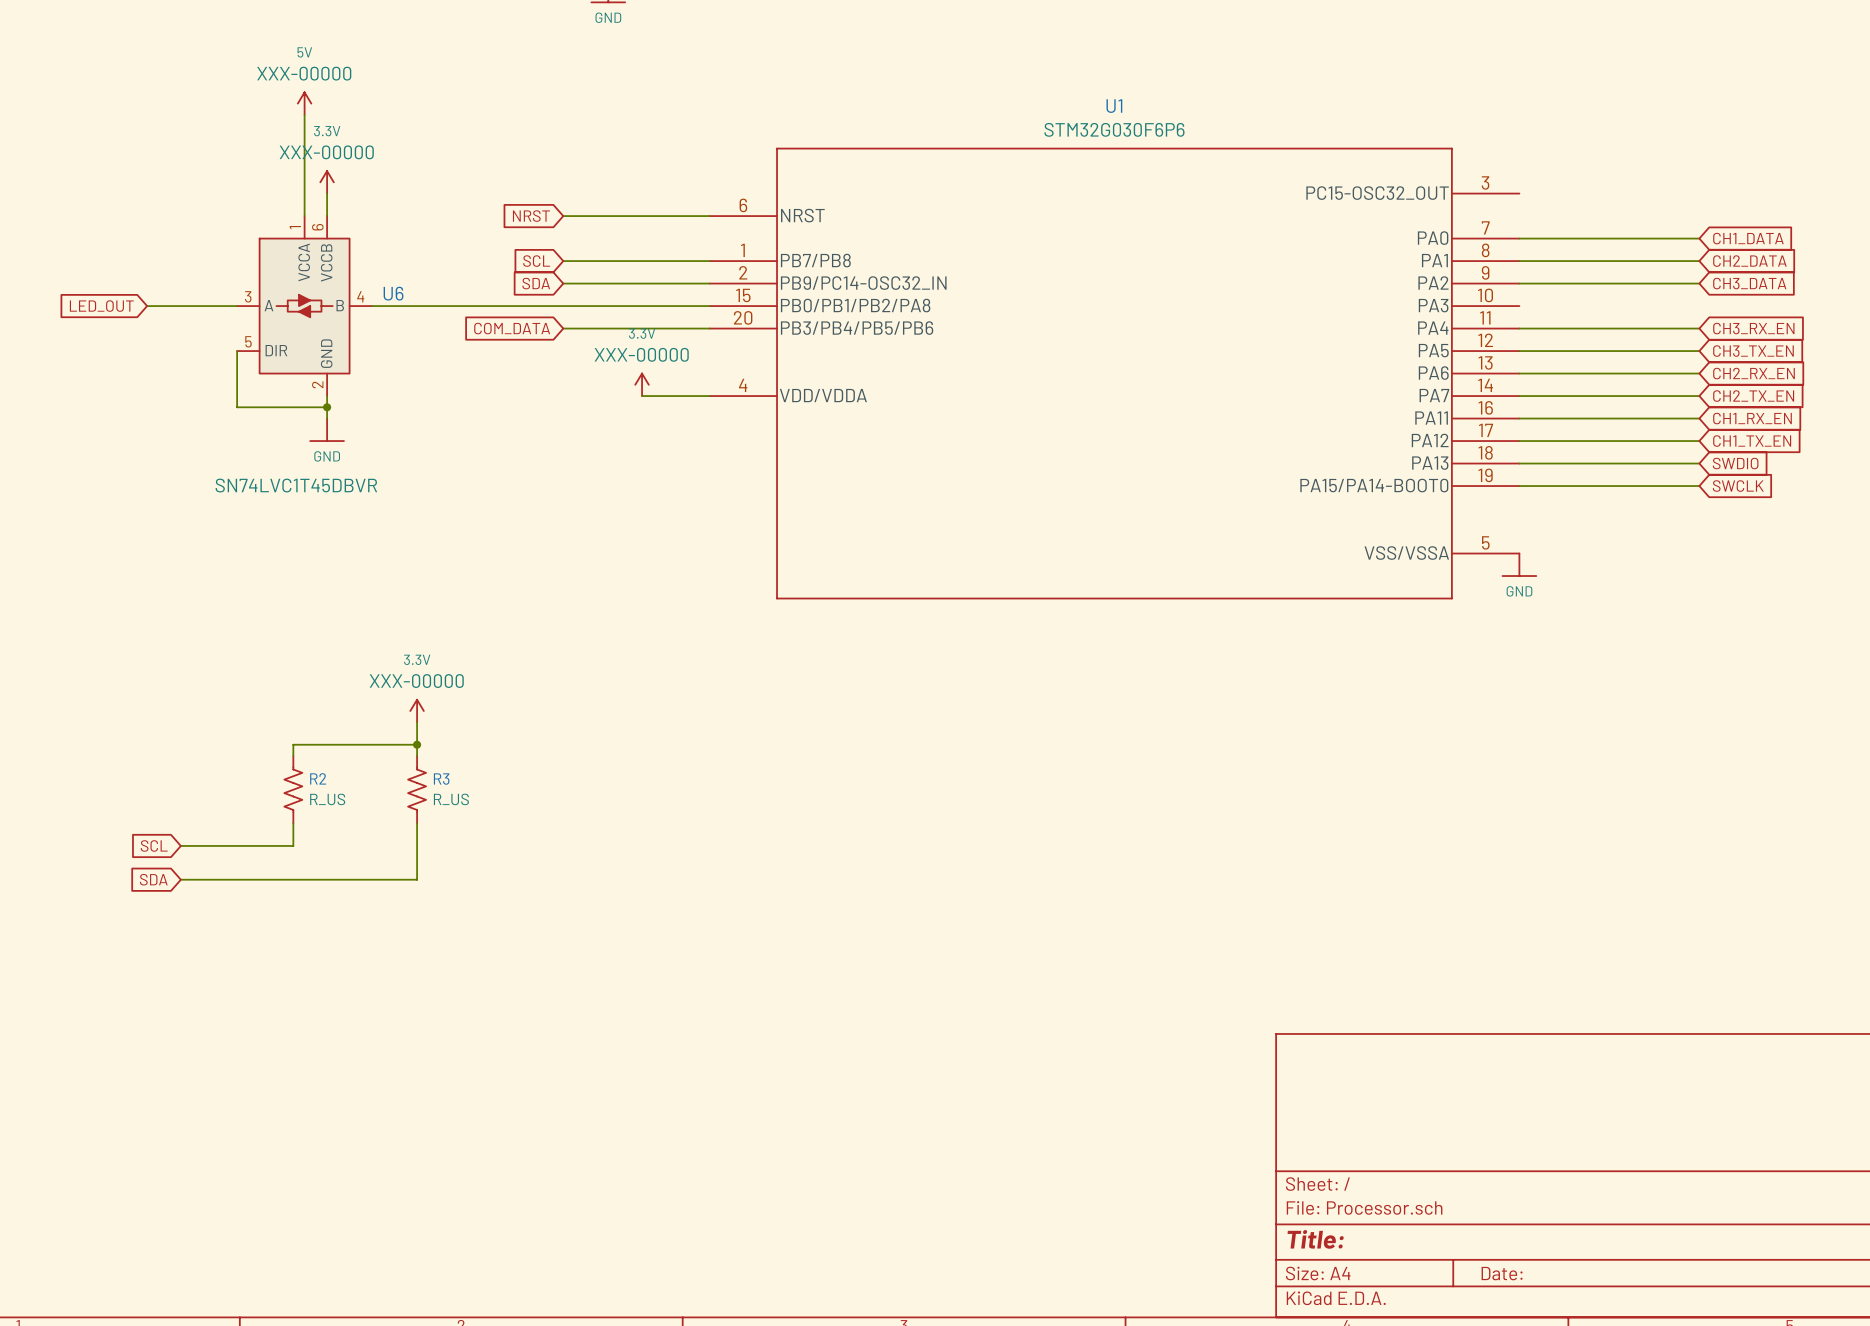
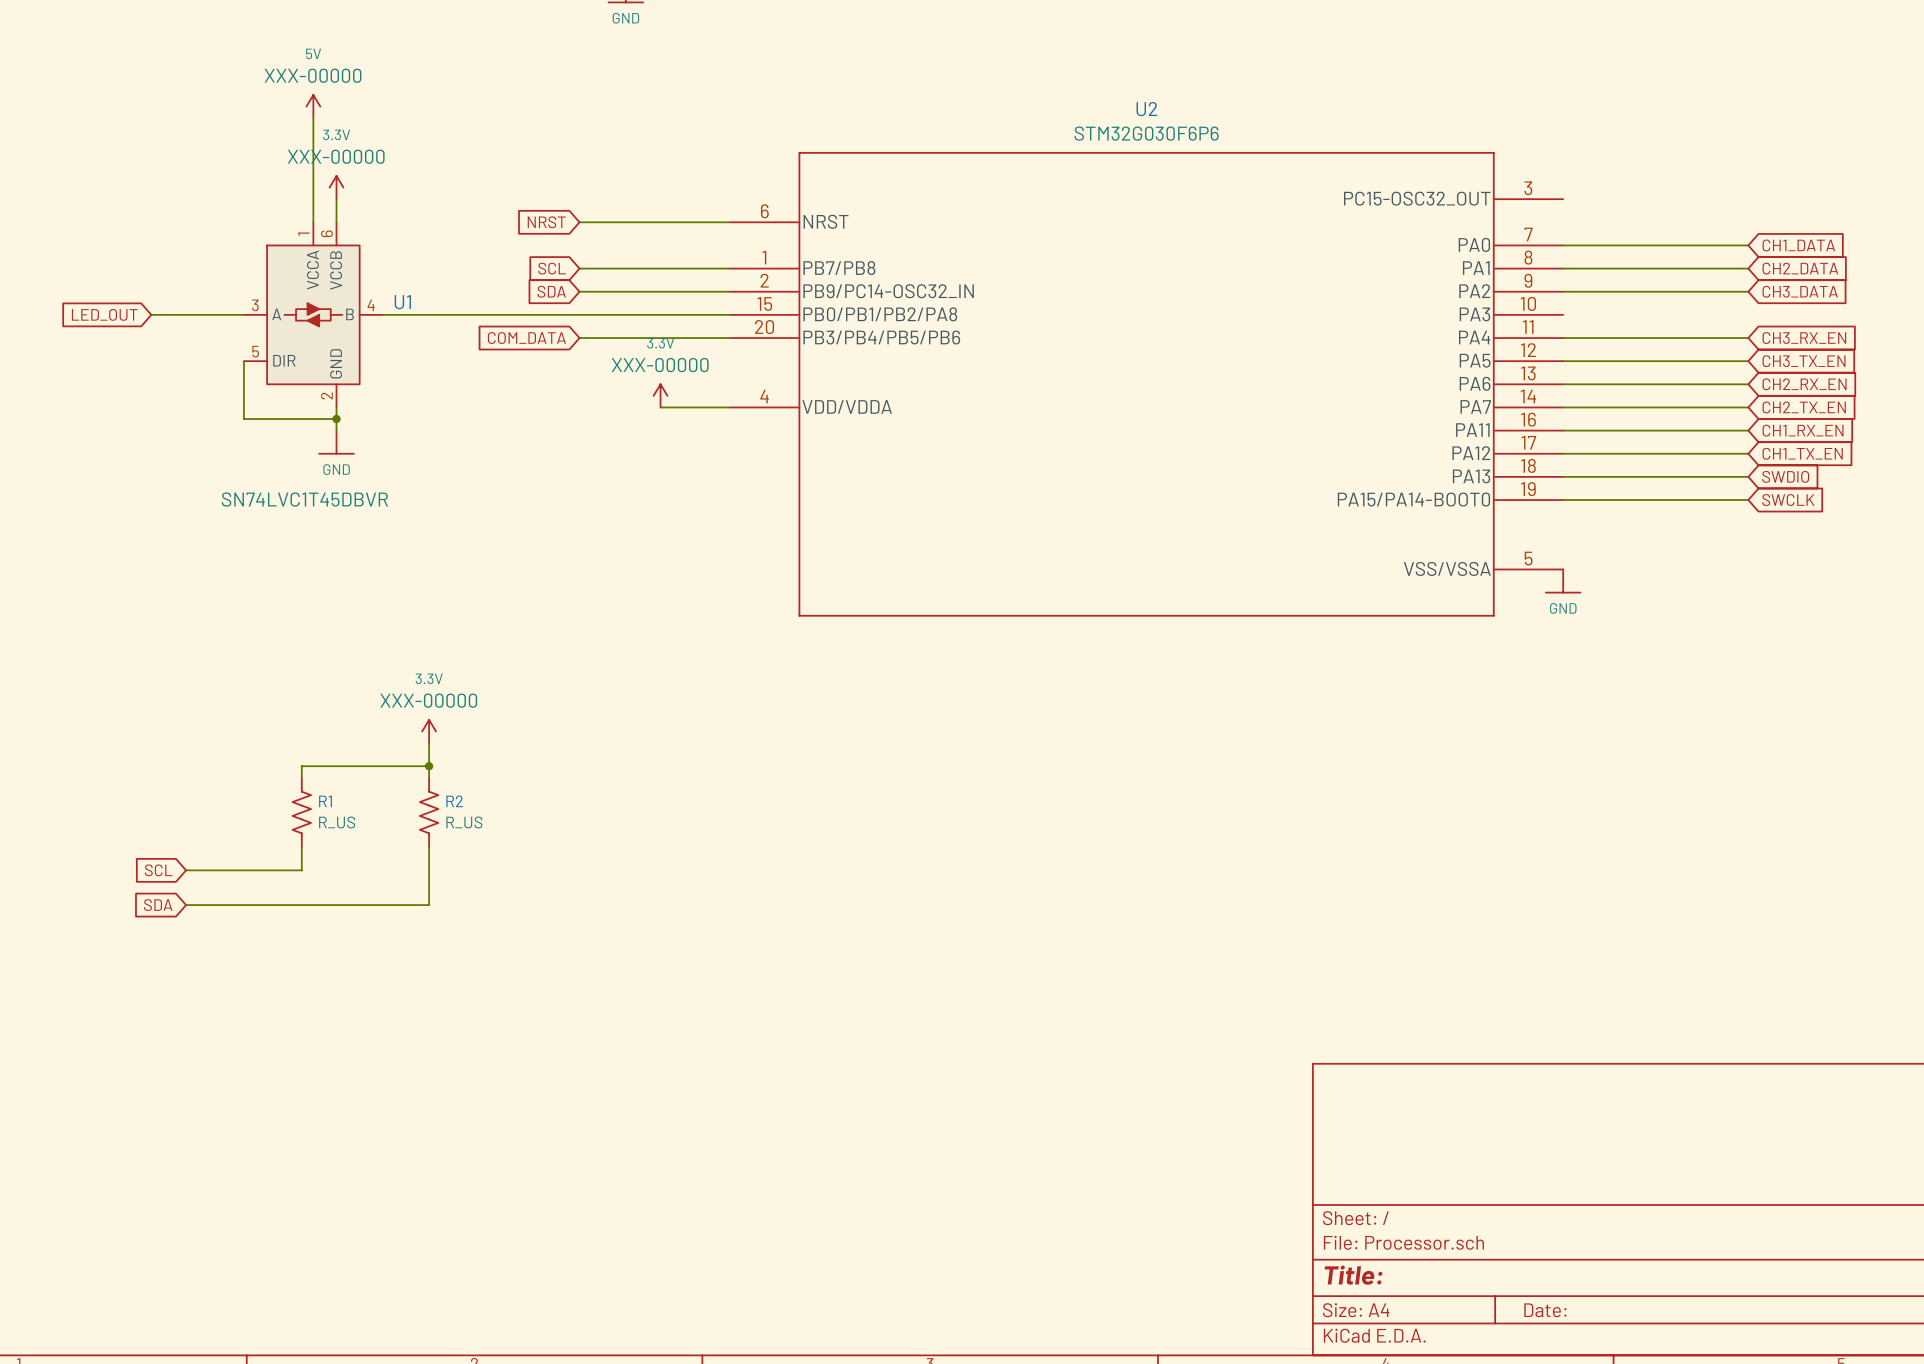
U1 name: U1 (1114, 106) -> U2 (1146, 109)
U6 name: U6 (393, 293) -> U1 (402, 302)
R2 name: R2 (318, 778) -> R1 (325, 801)
R3 name: R3 (441, 779) -> R2 (454, 801)

